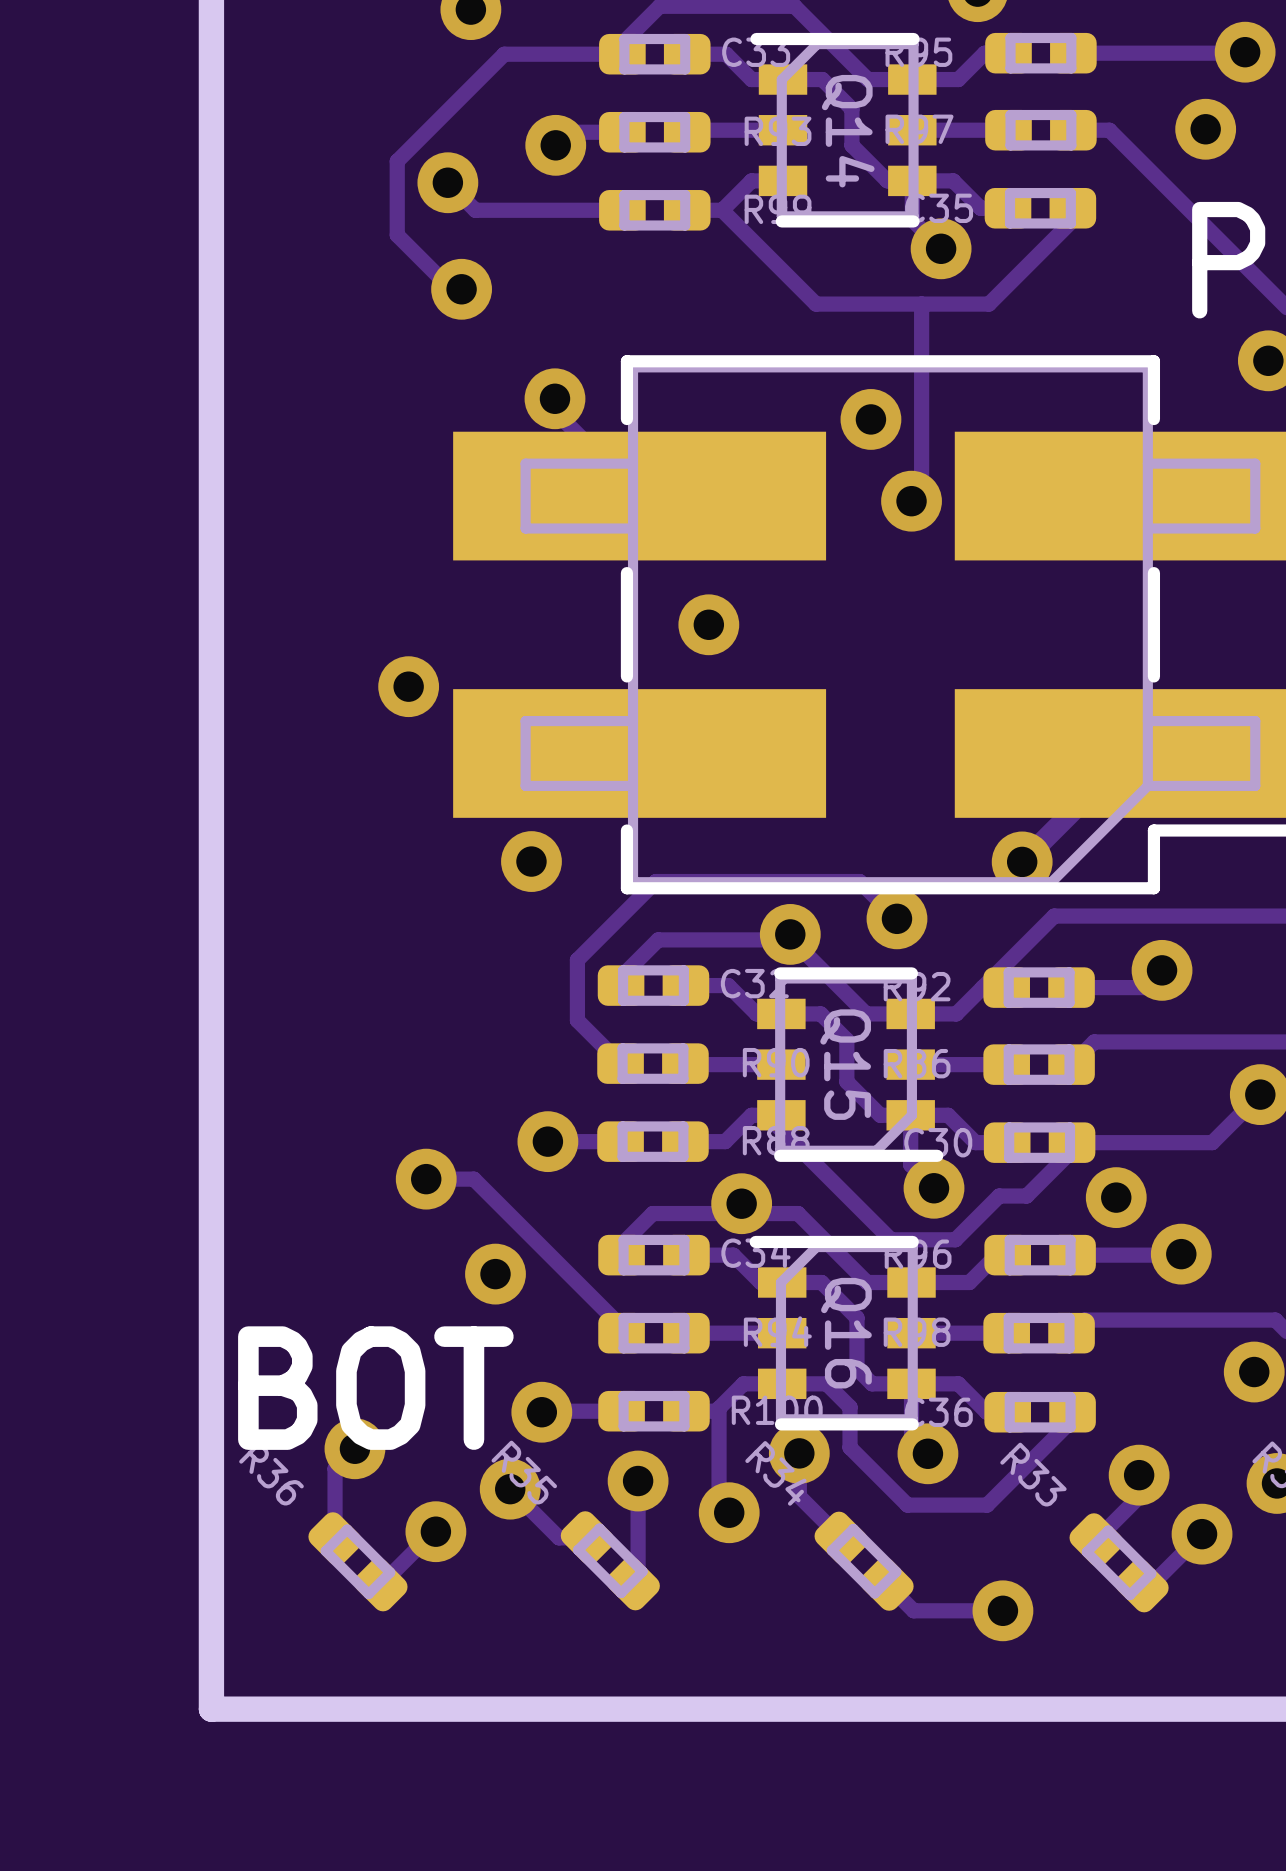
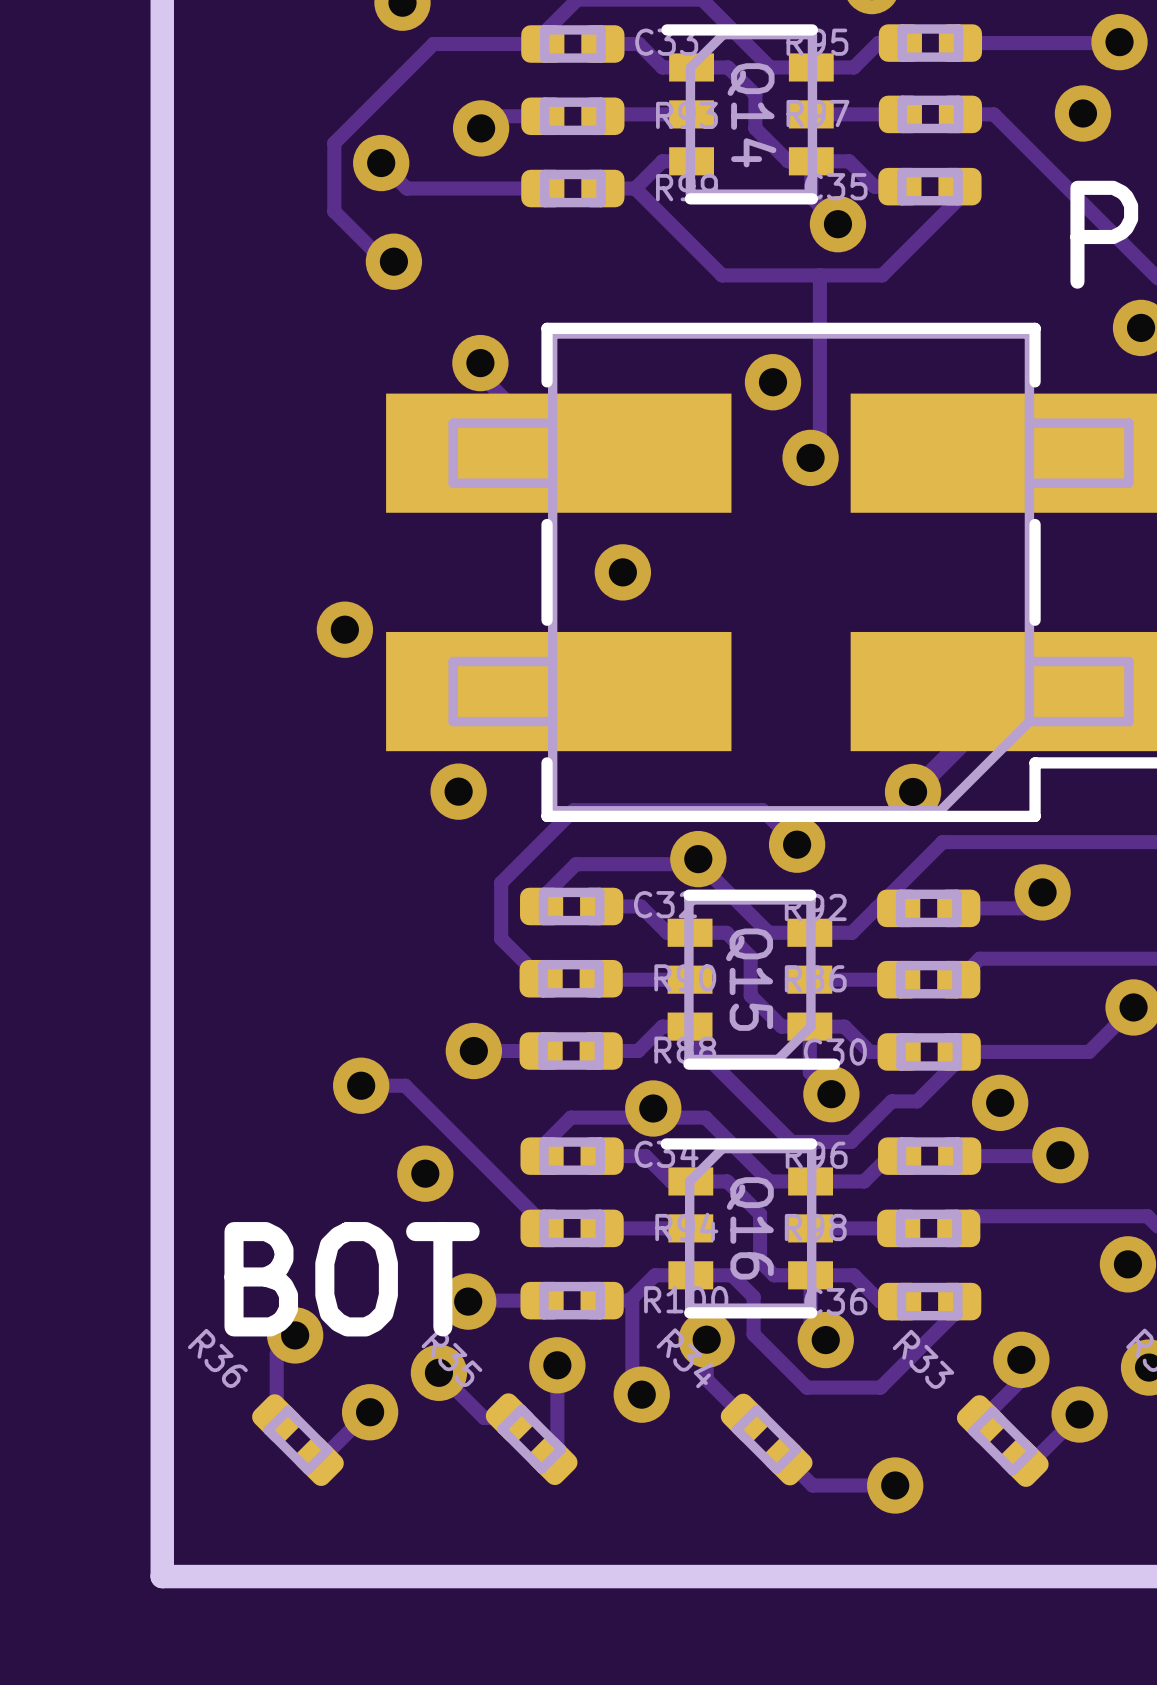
text position: BOT (375, 1388) -> BOT (352, 1279)

